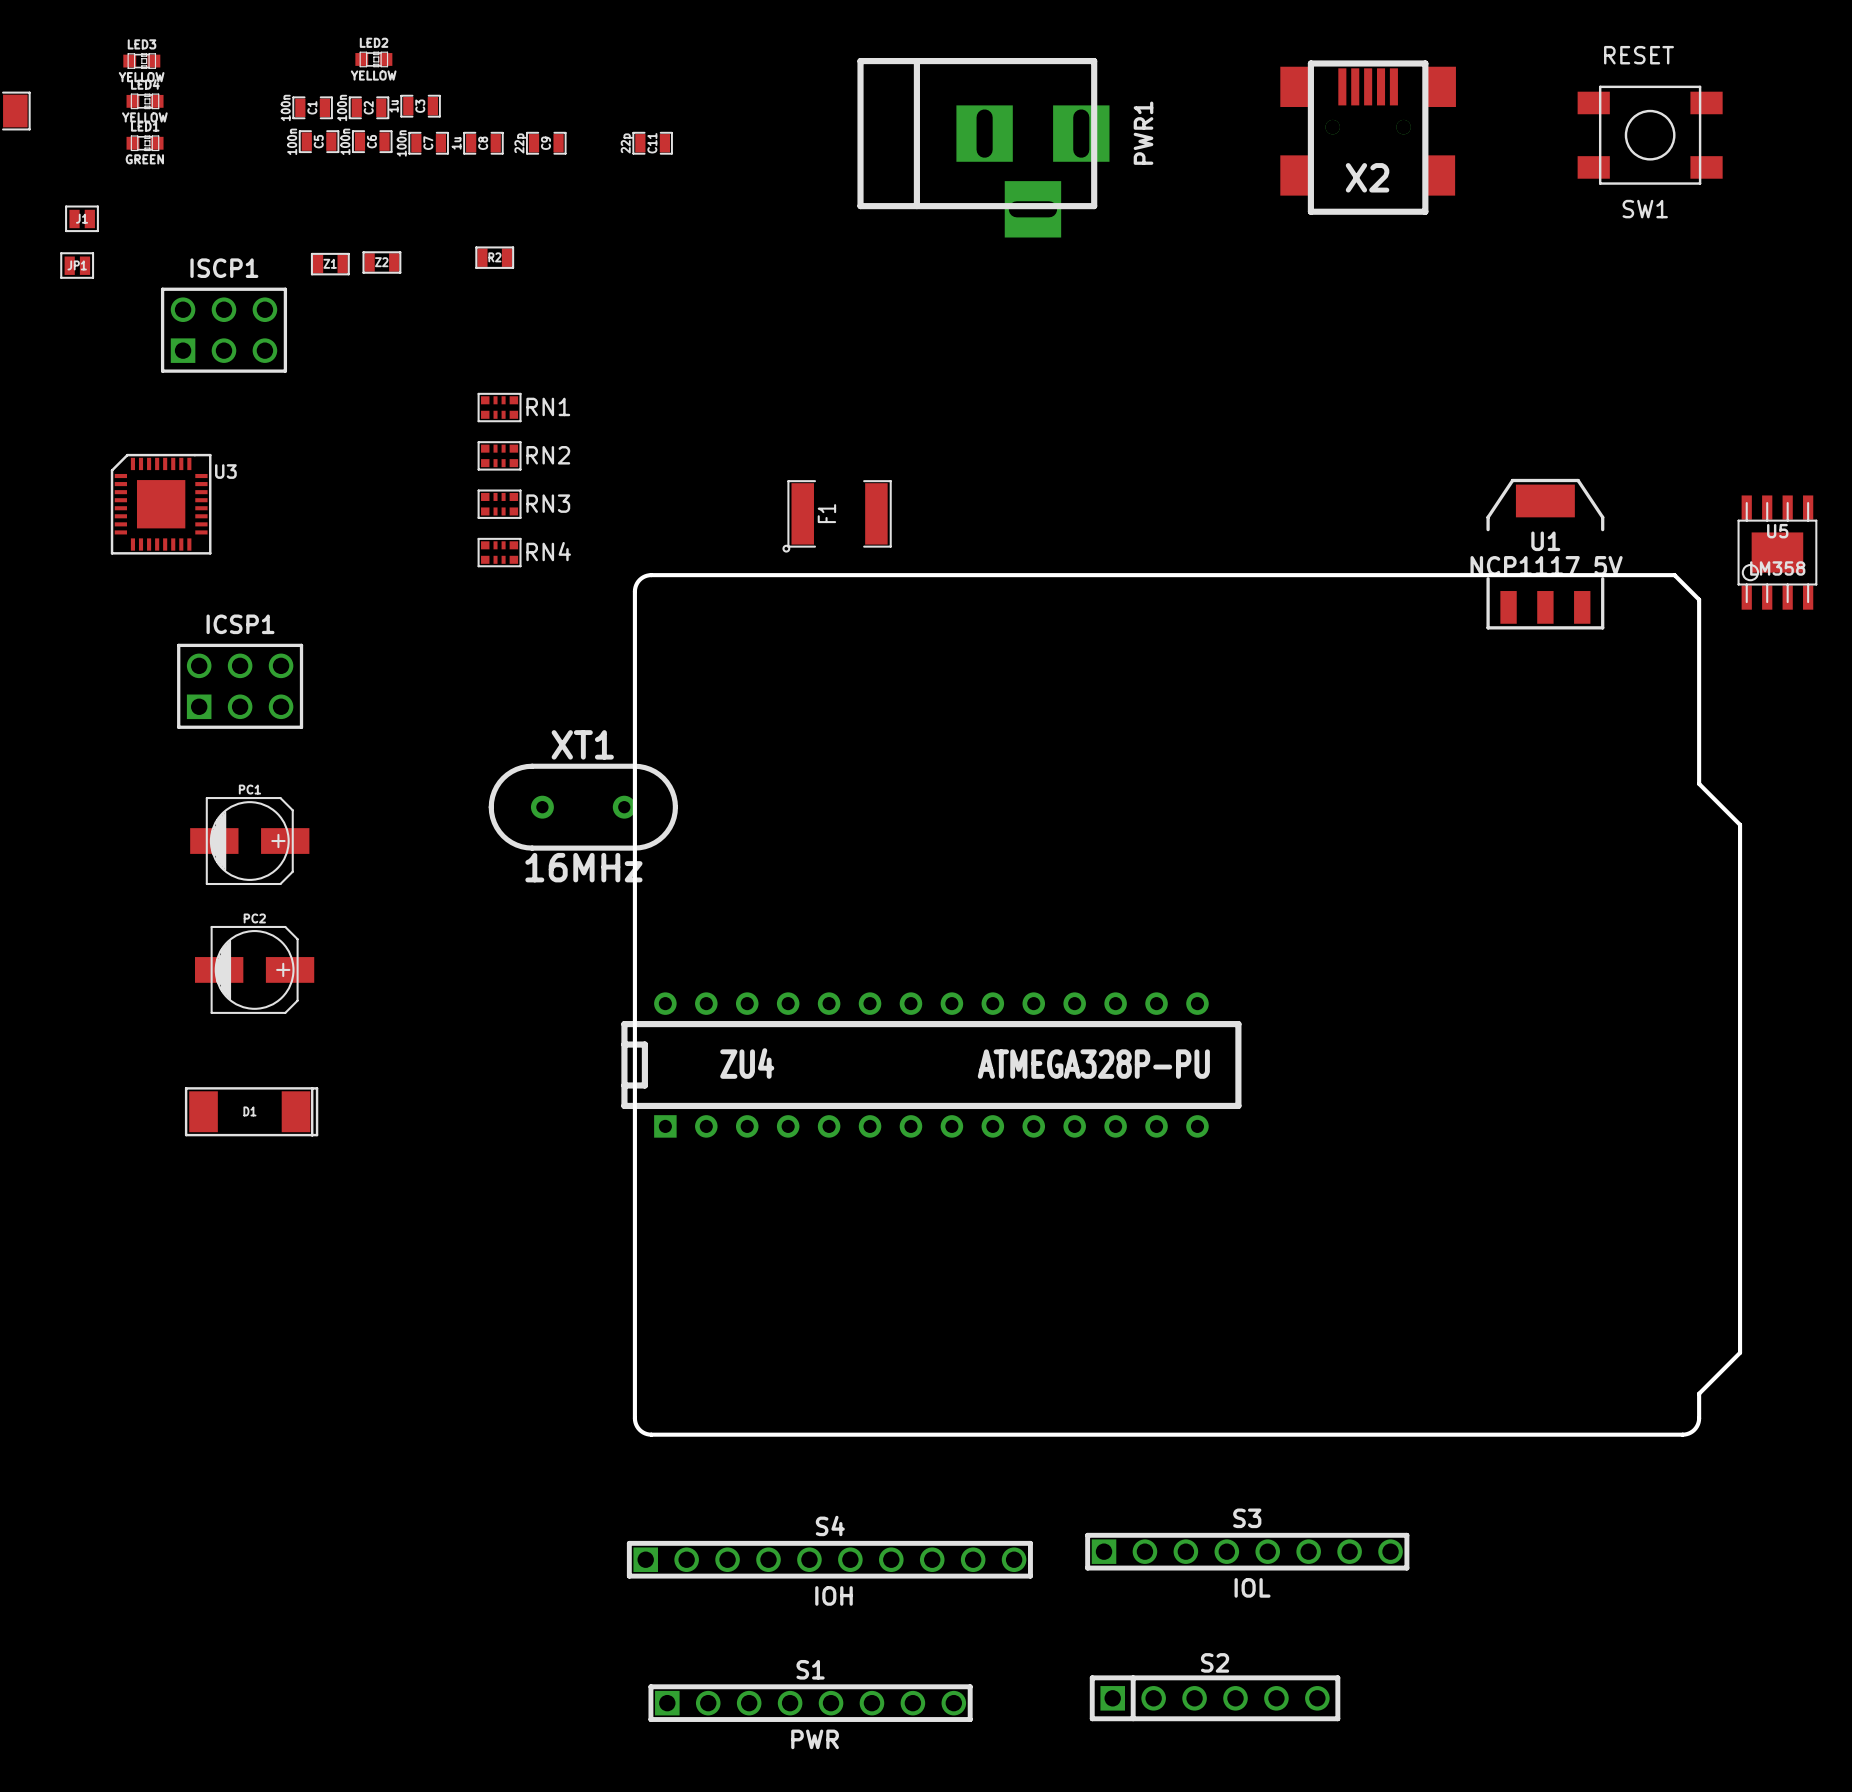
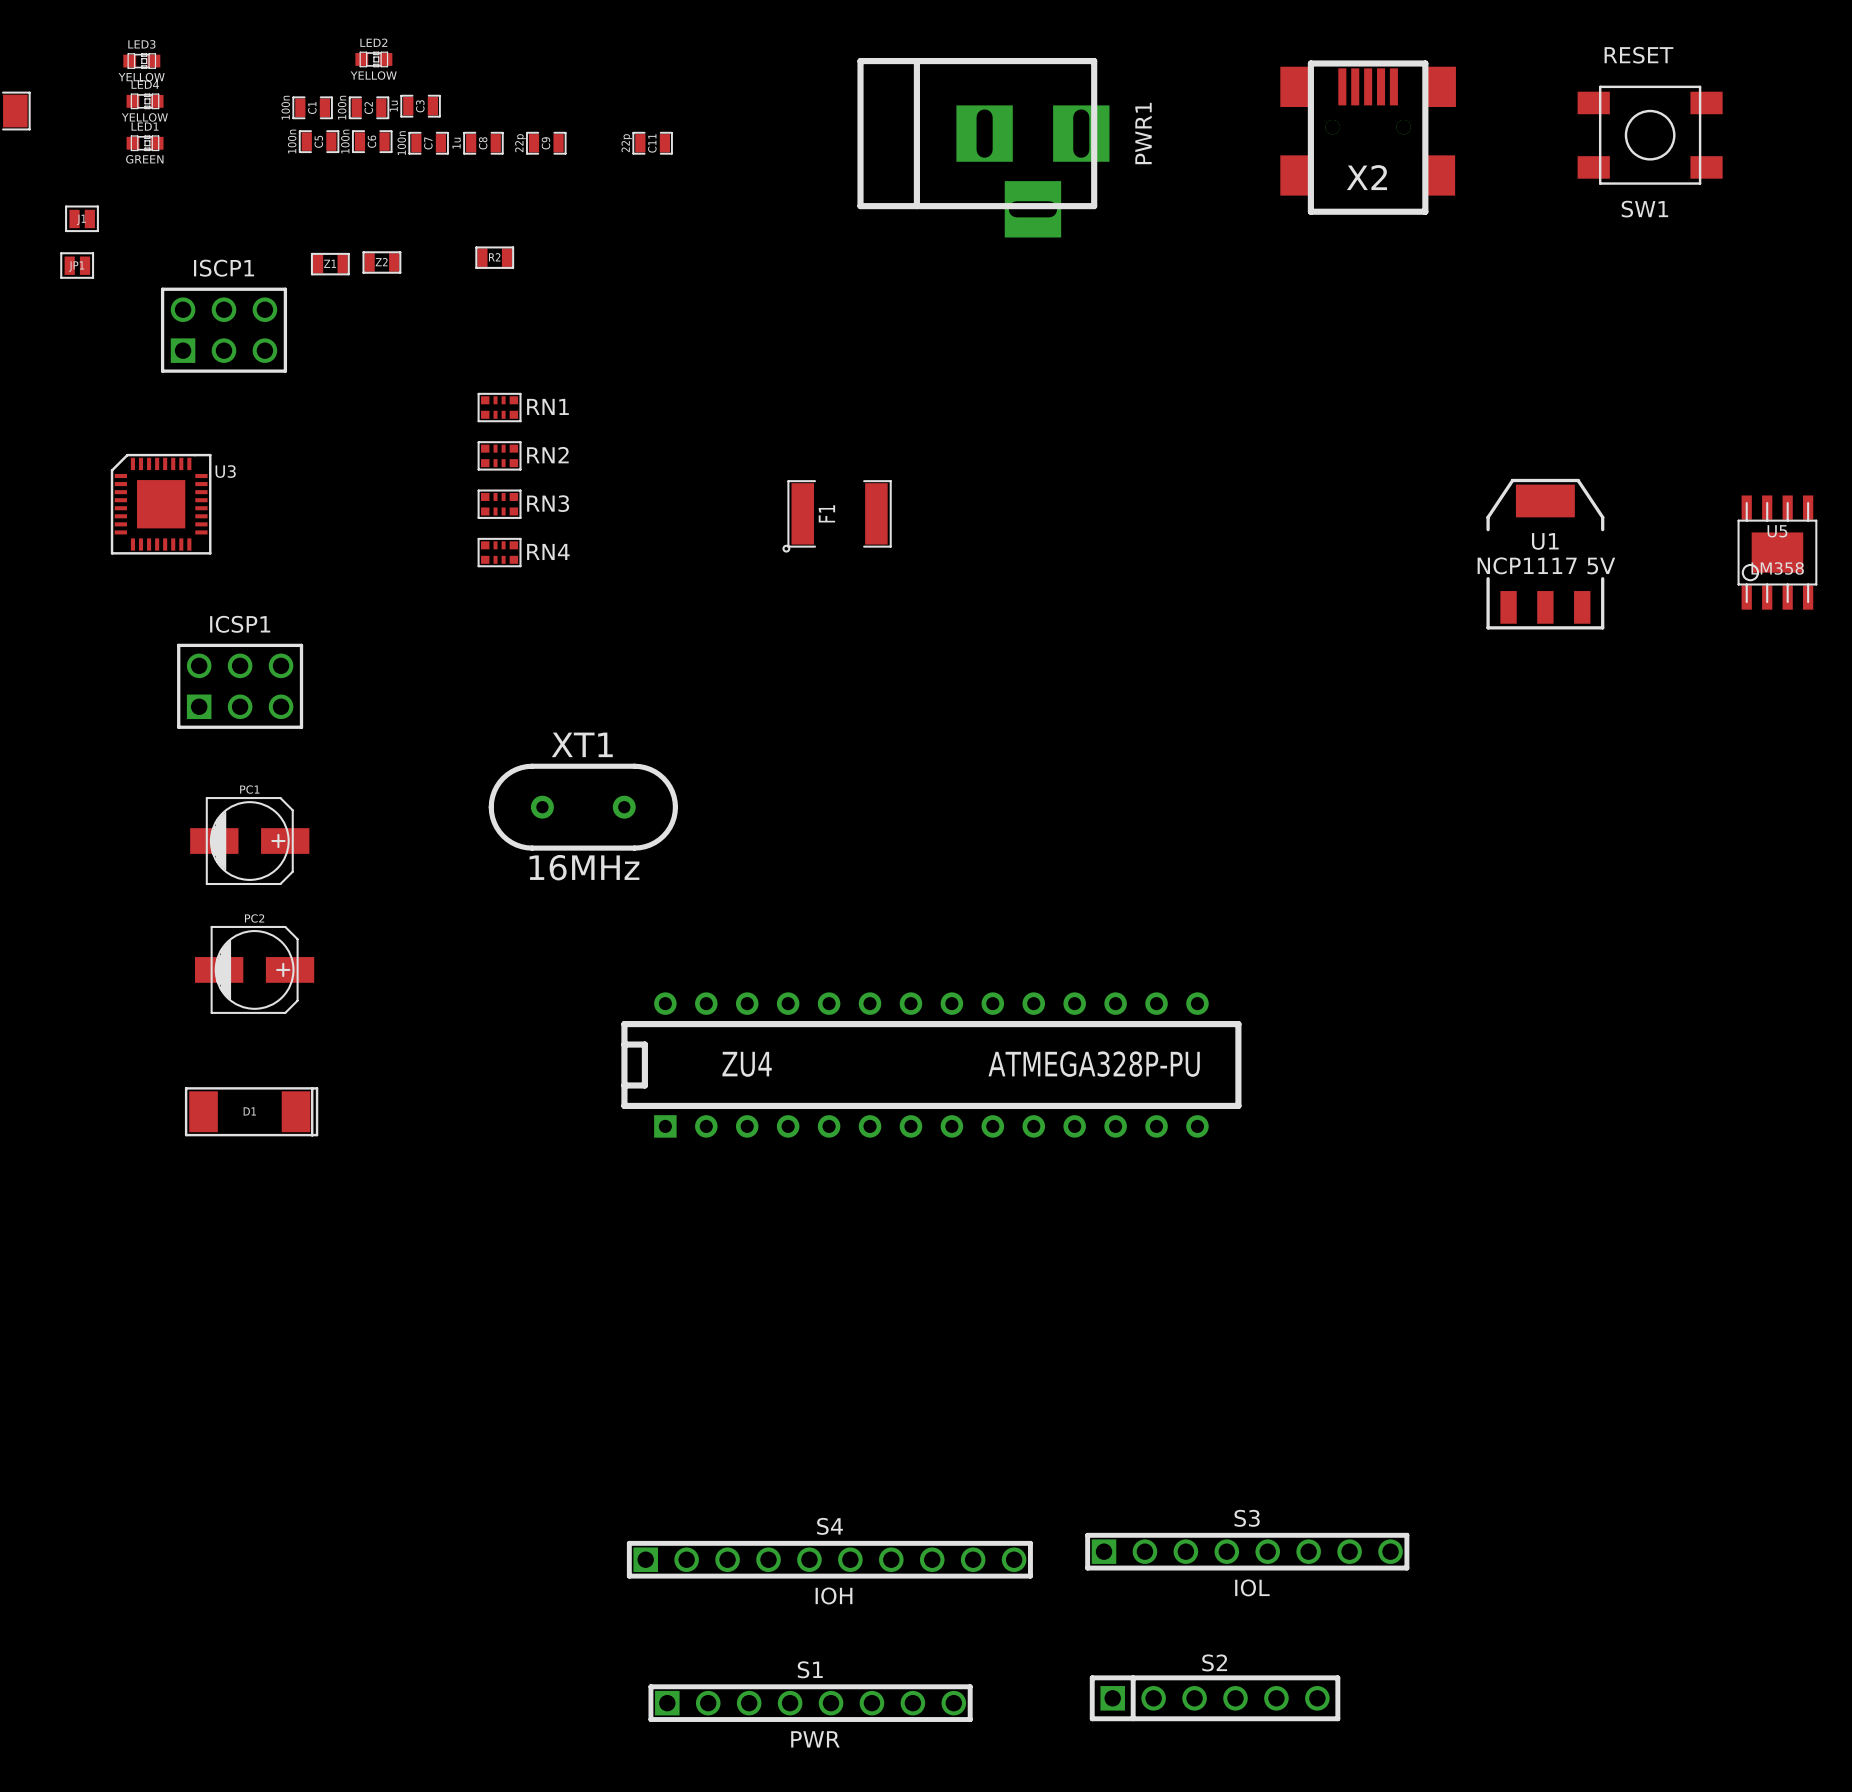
board edge: (651, 575) (1674, 575) (1699, 599) (1699, 783) (1740, 824) (1740, 1352) (1699, 1393) (1698, 1420) (1695, 1428) (1690, 1432) (1682, 1434) (651, 1434) (641, 1431) (637, 1426) (634, 1418) (634, 591) (639, 579) (651, 575) -> none

